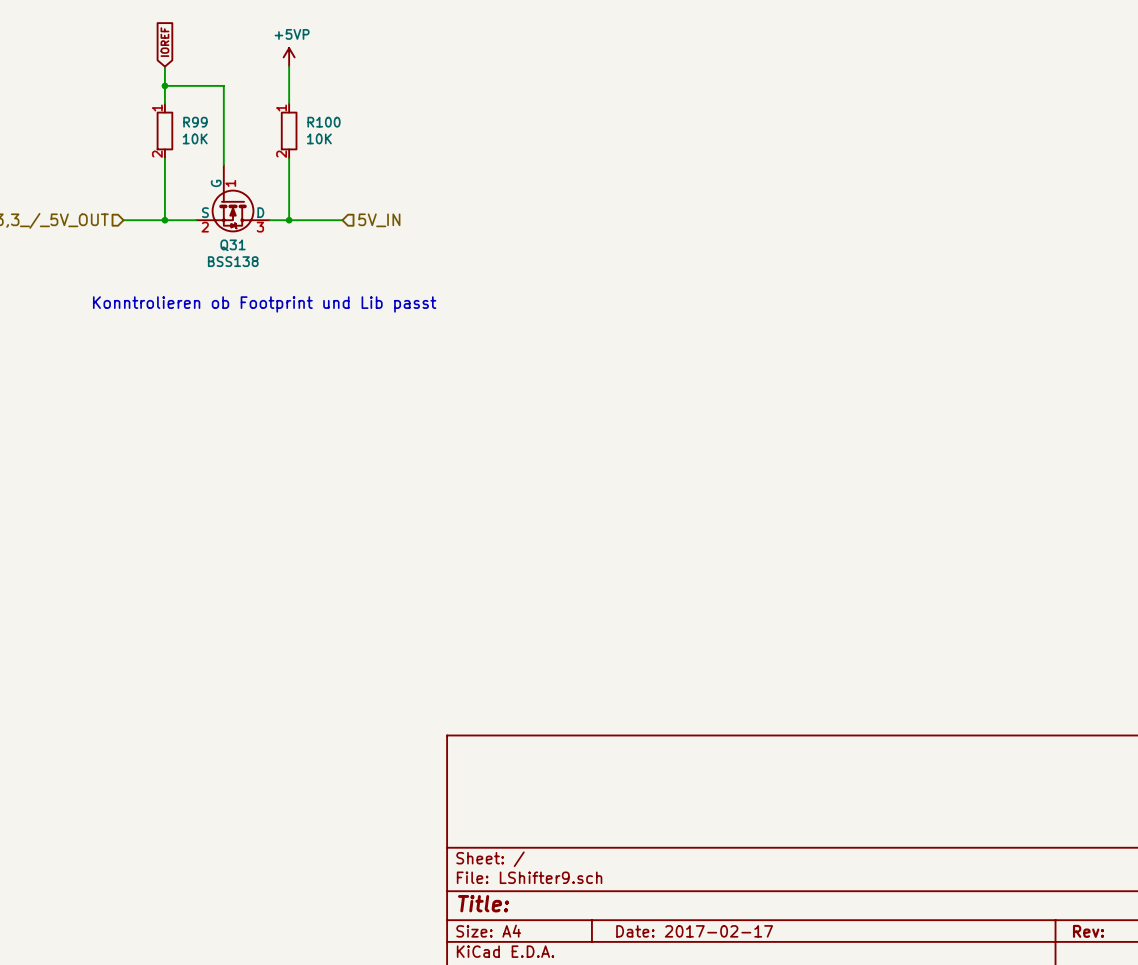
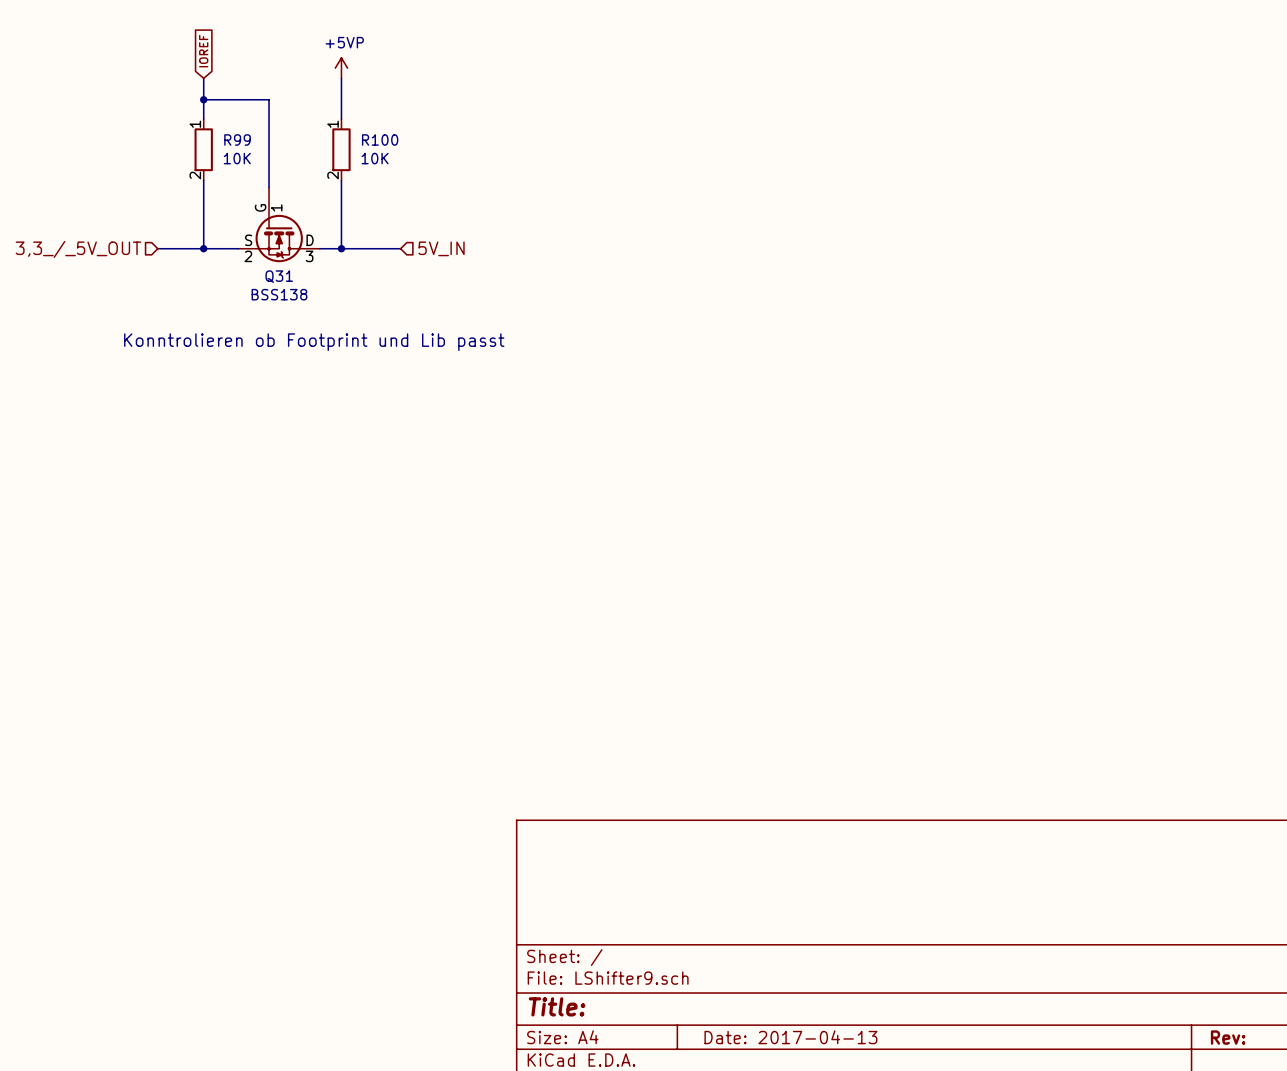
title block: Date: 2017-02-17 (694, 931) -> Date: 2017-04-13 (790, 1037)

